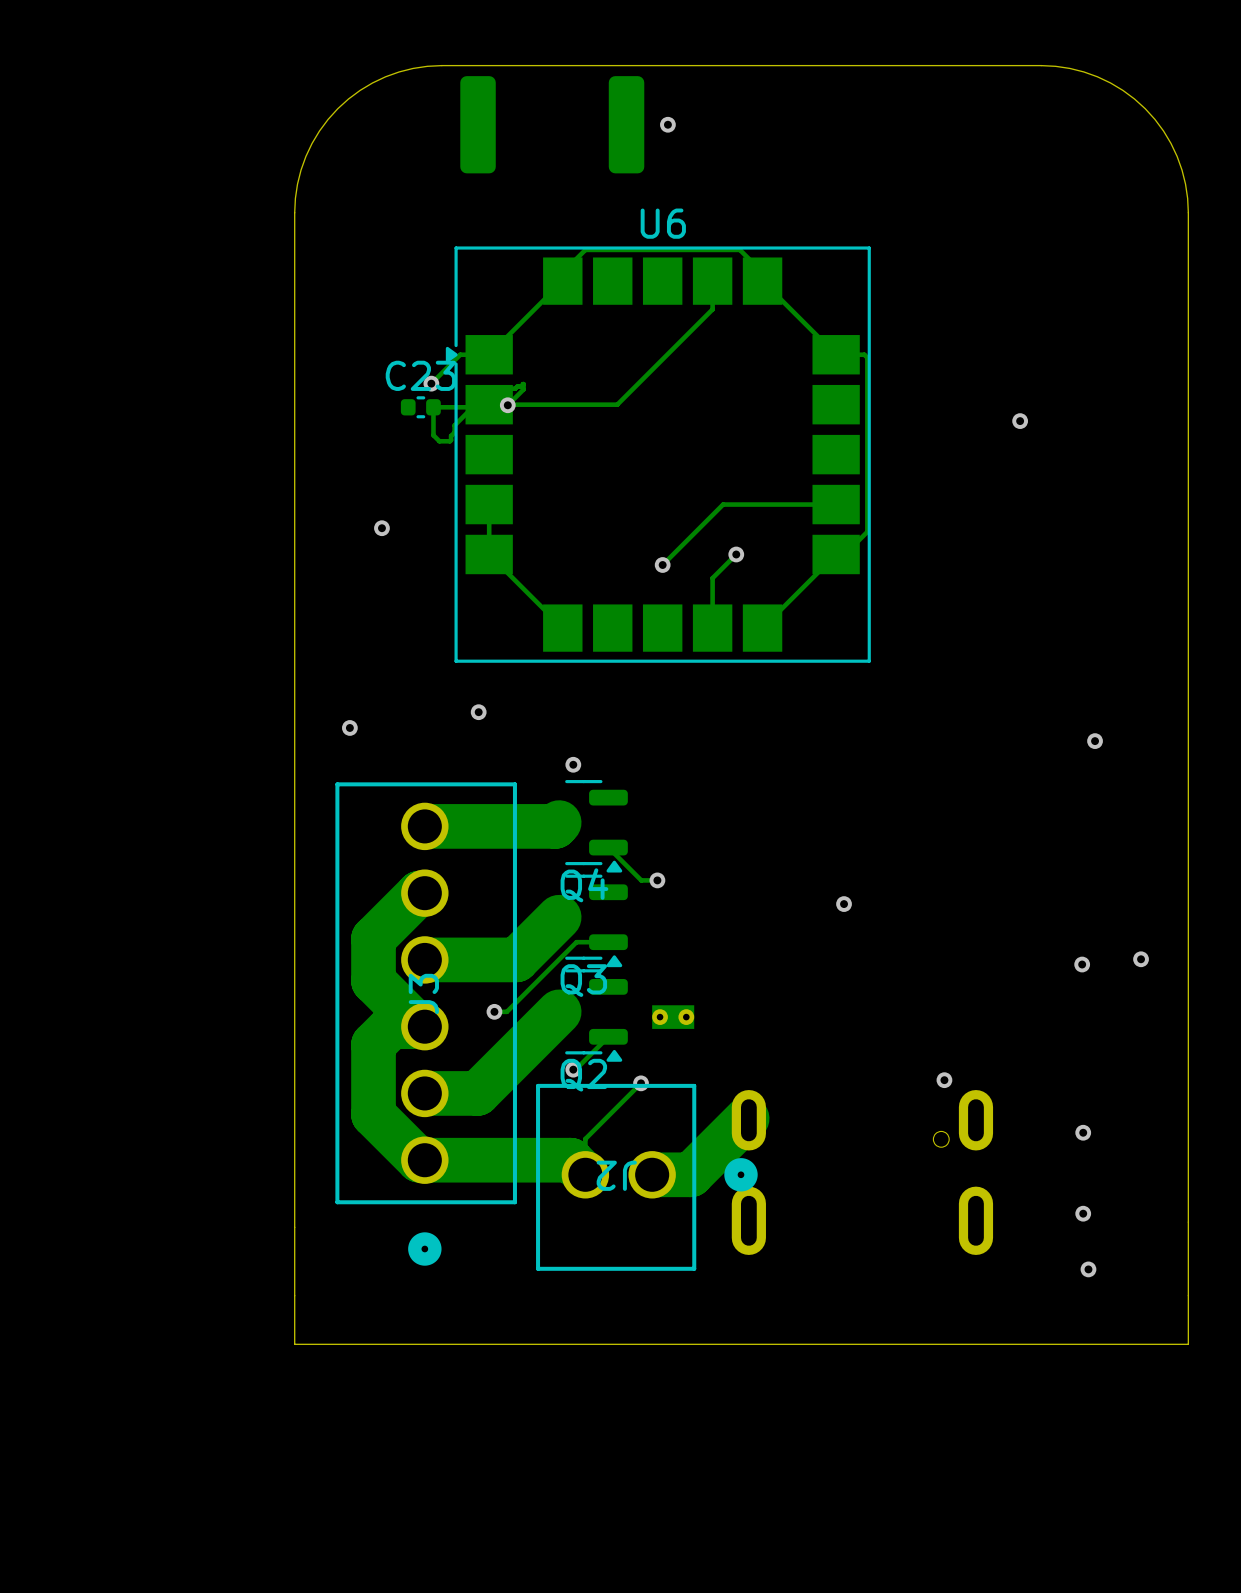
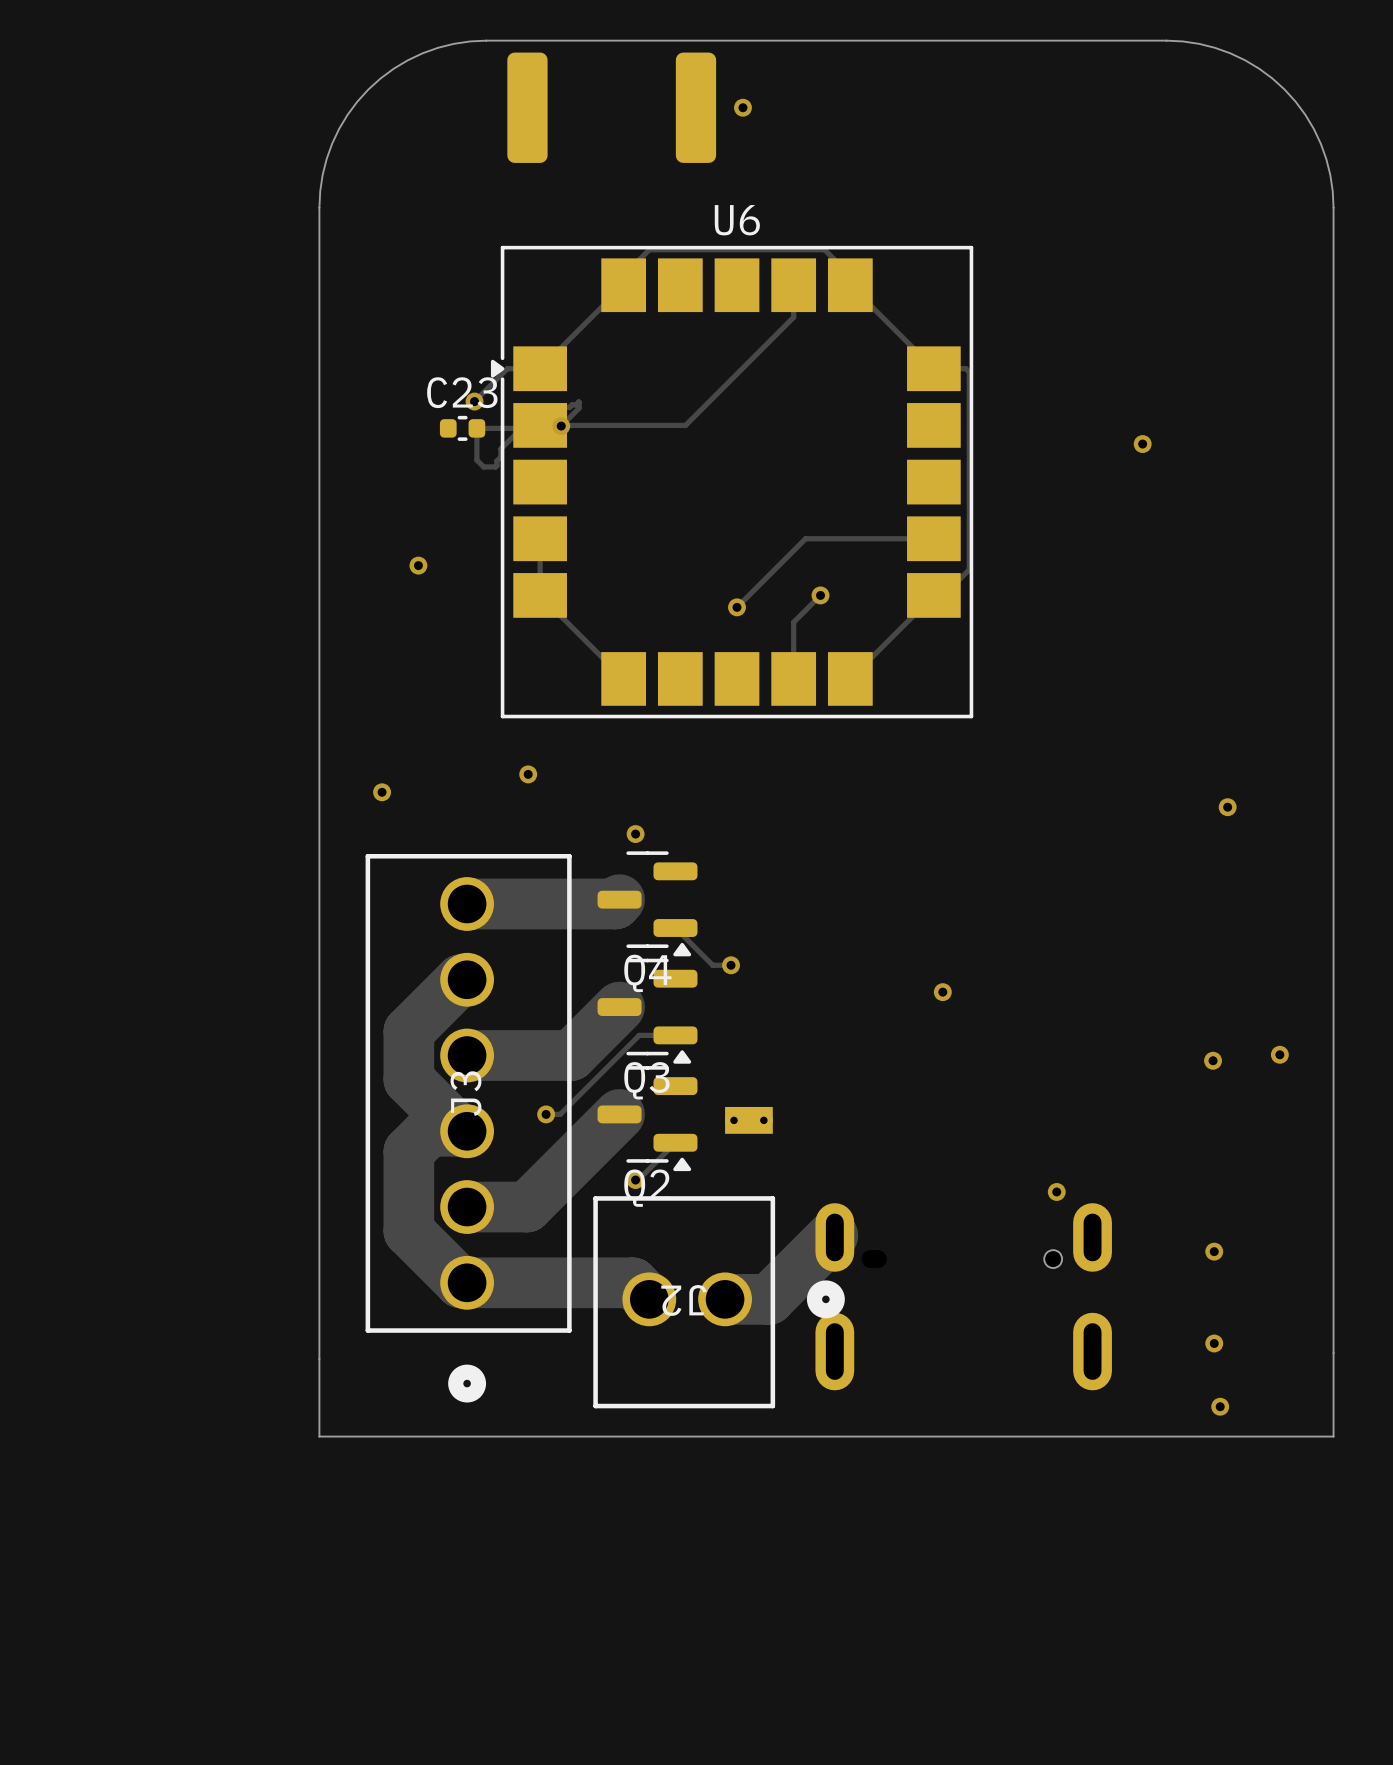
track: (641, 1083) (585, 1138) (585, 1174) -> none
via: (641, 1083) -> none
board edge: (1188, 1295) (1188, 1344) (294, 1344) (294, 1295) -> (1333, 1436) (319, 1436)

